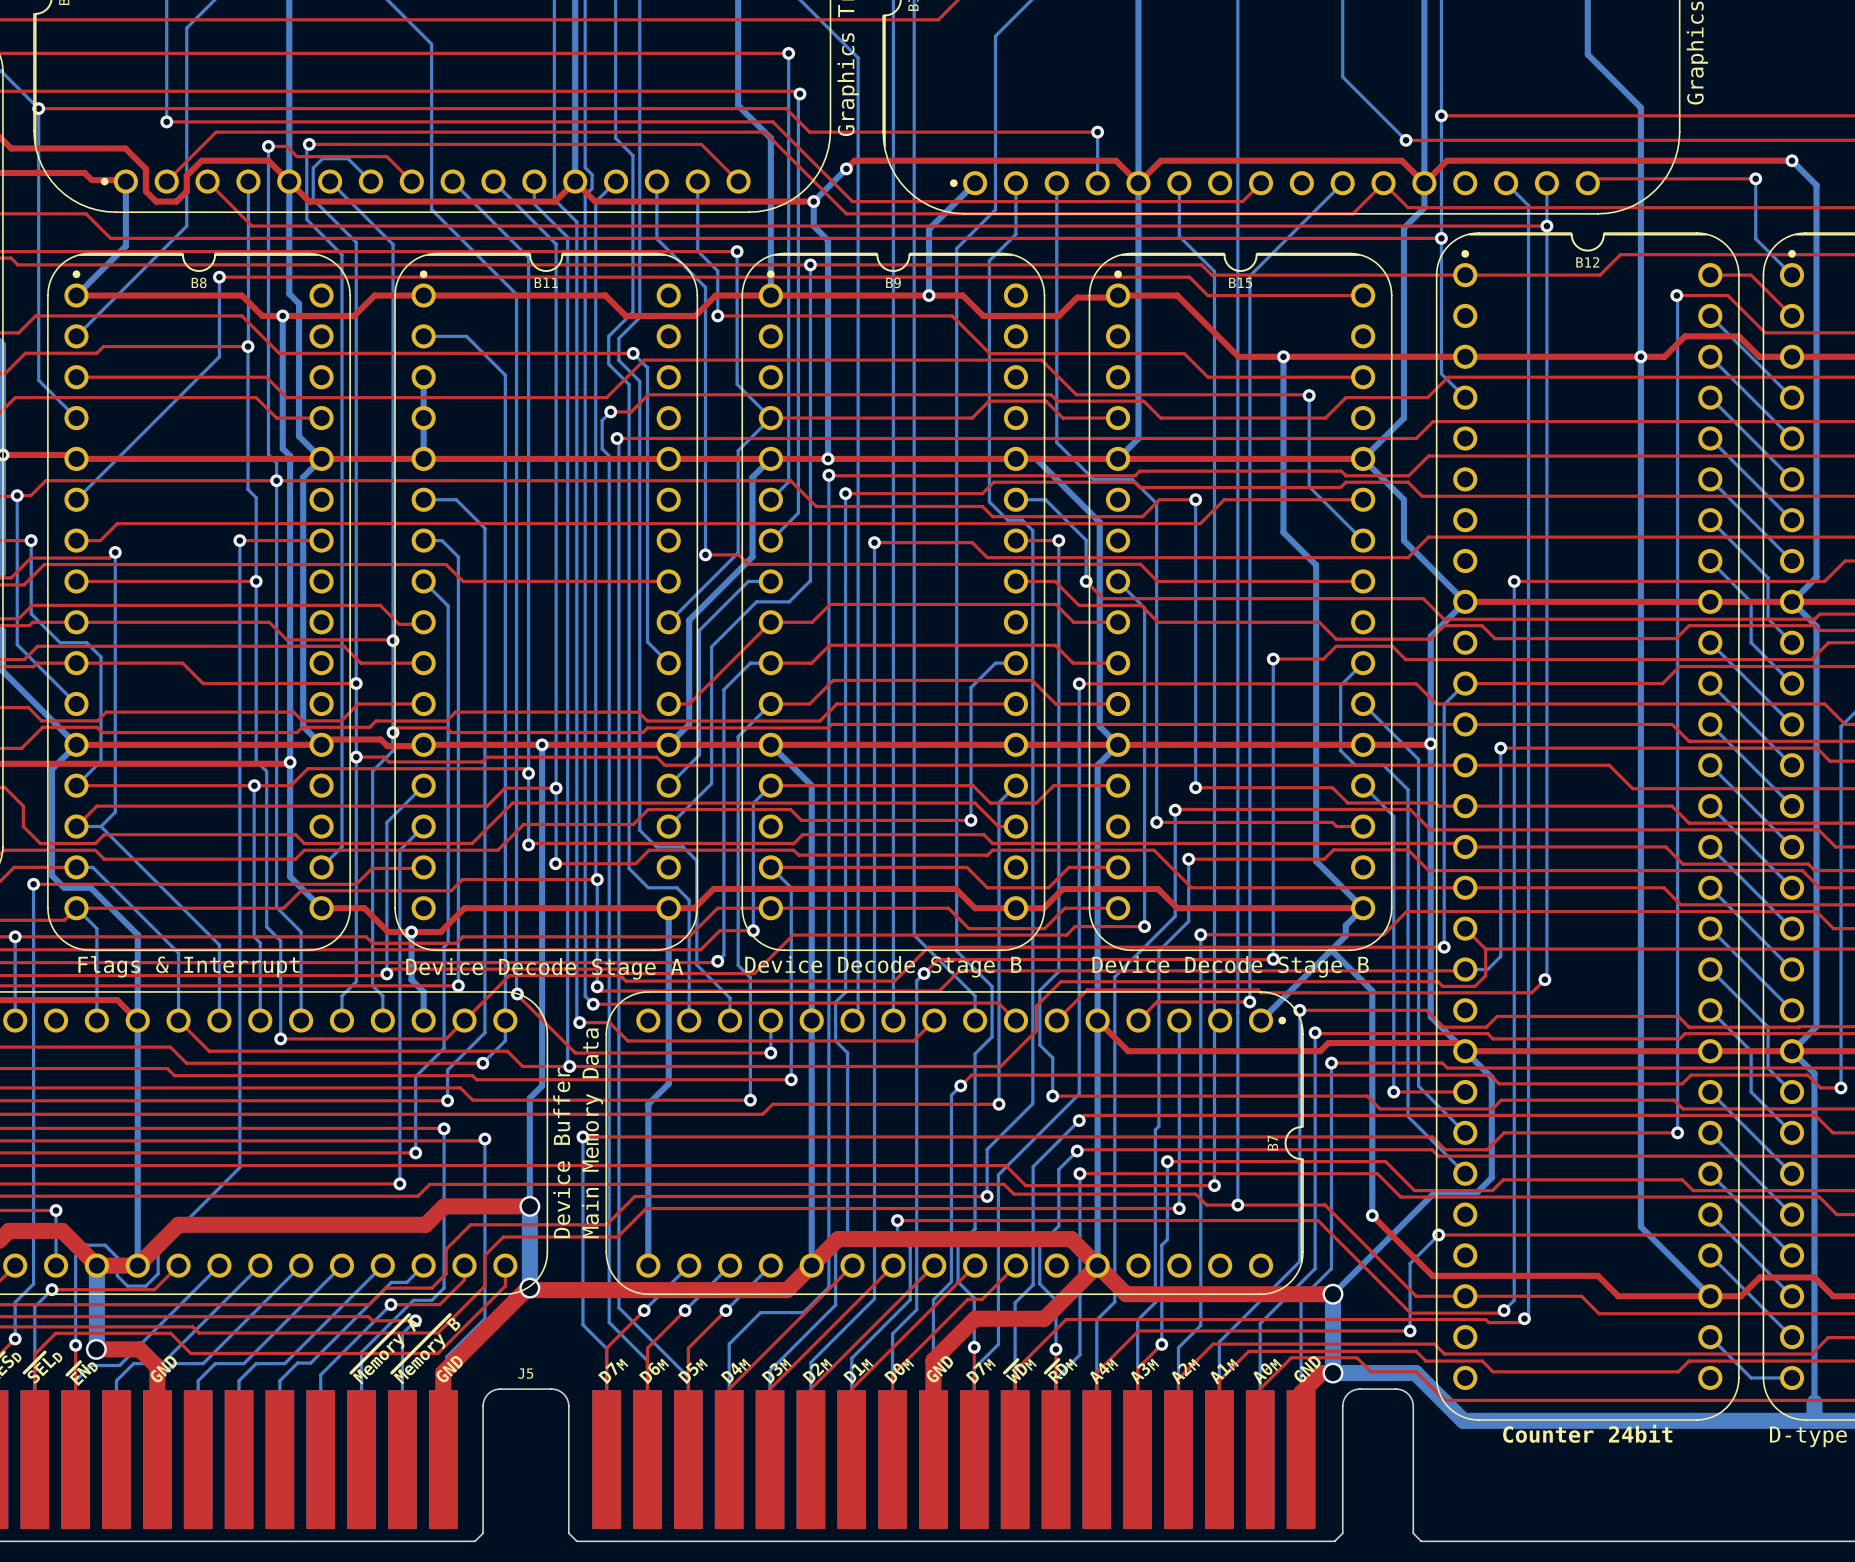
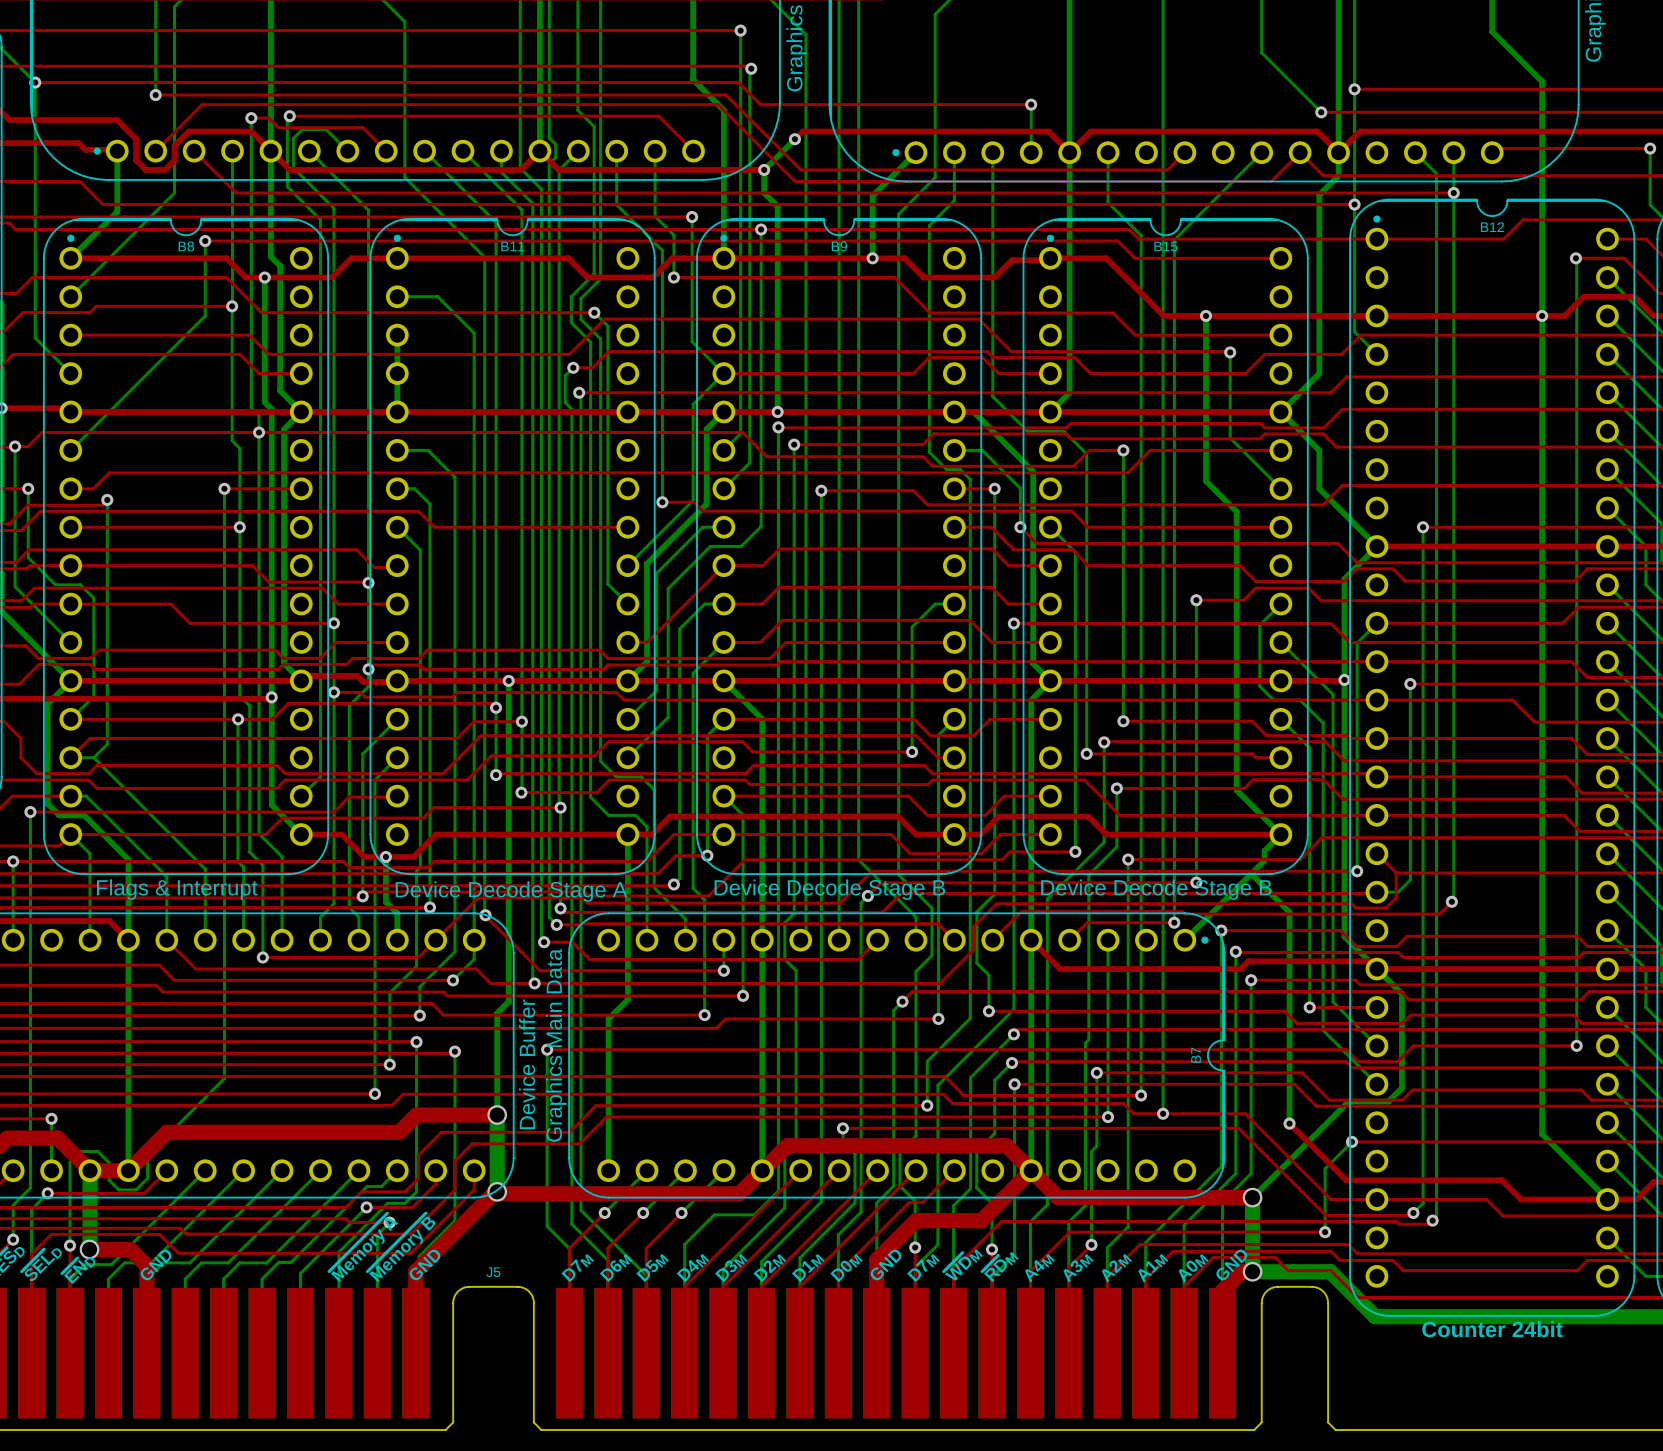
B7 text: Main Memory Data (592, 1133) -> Graphics Main Data (556, 1045)

